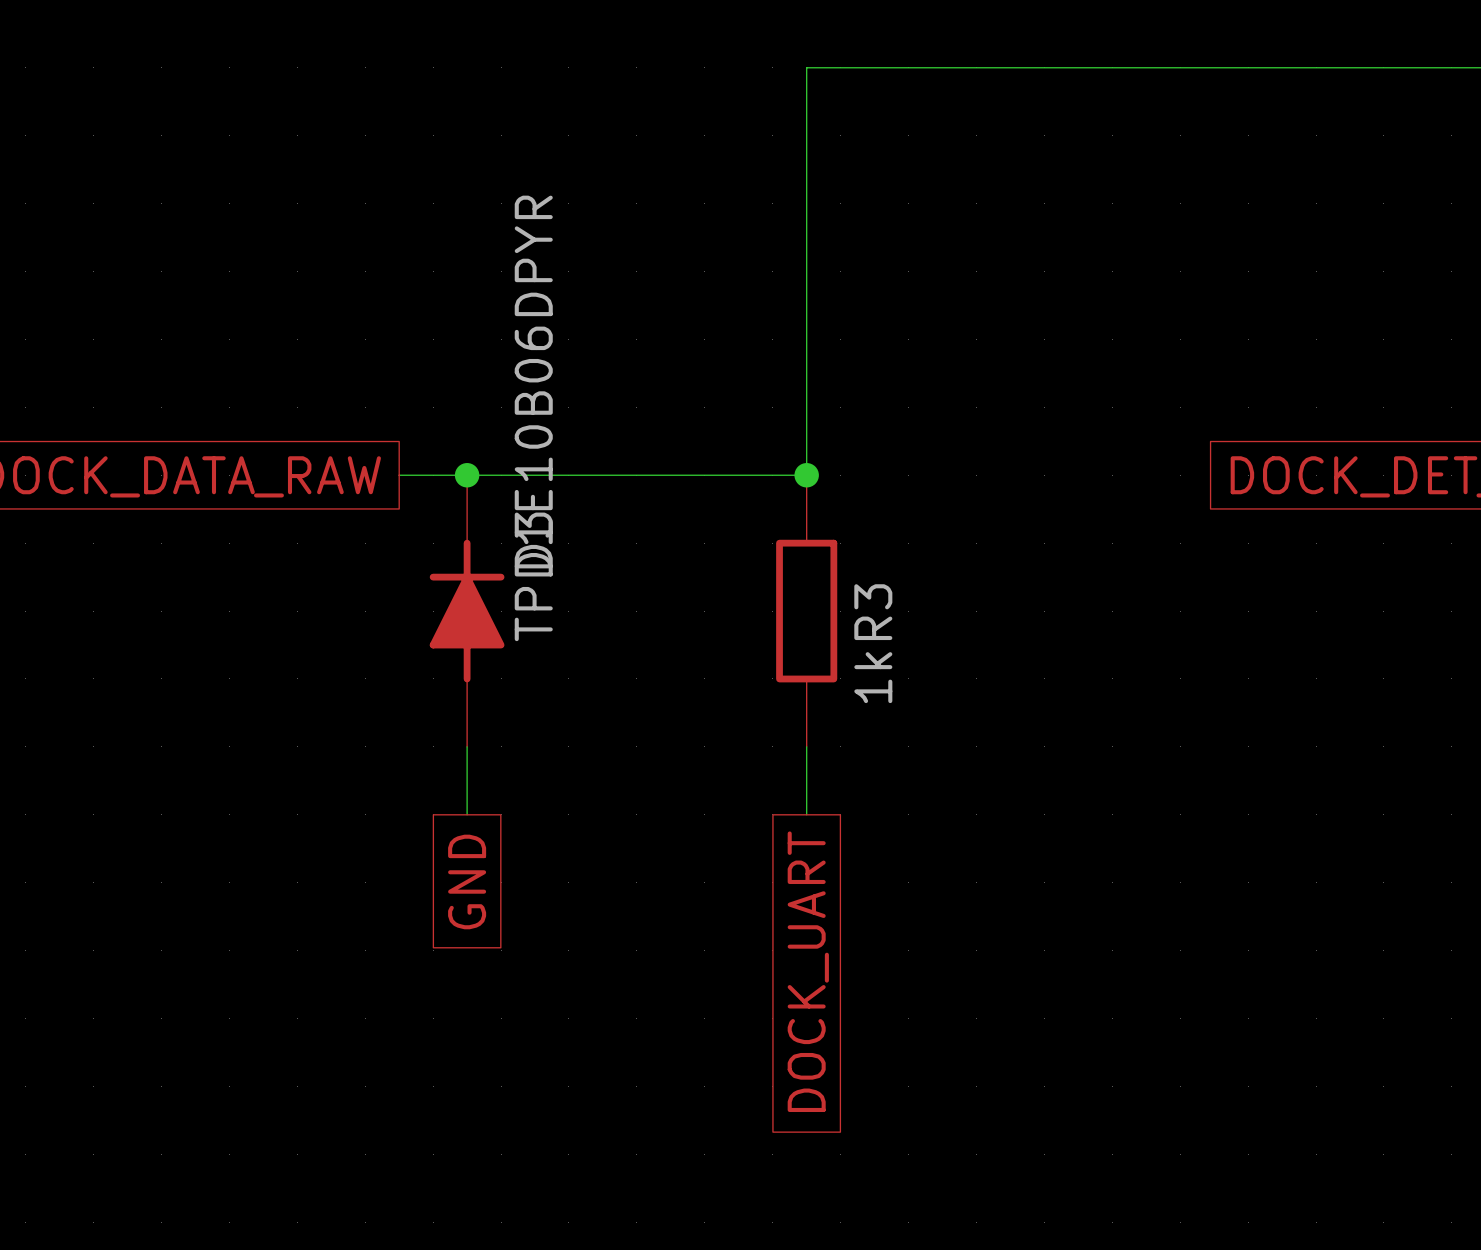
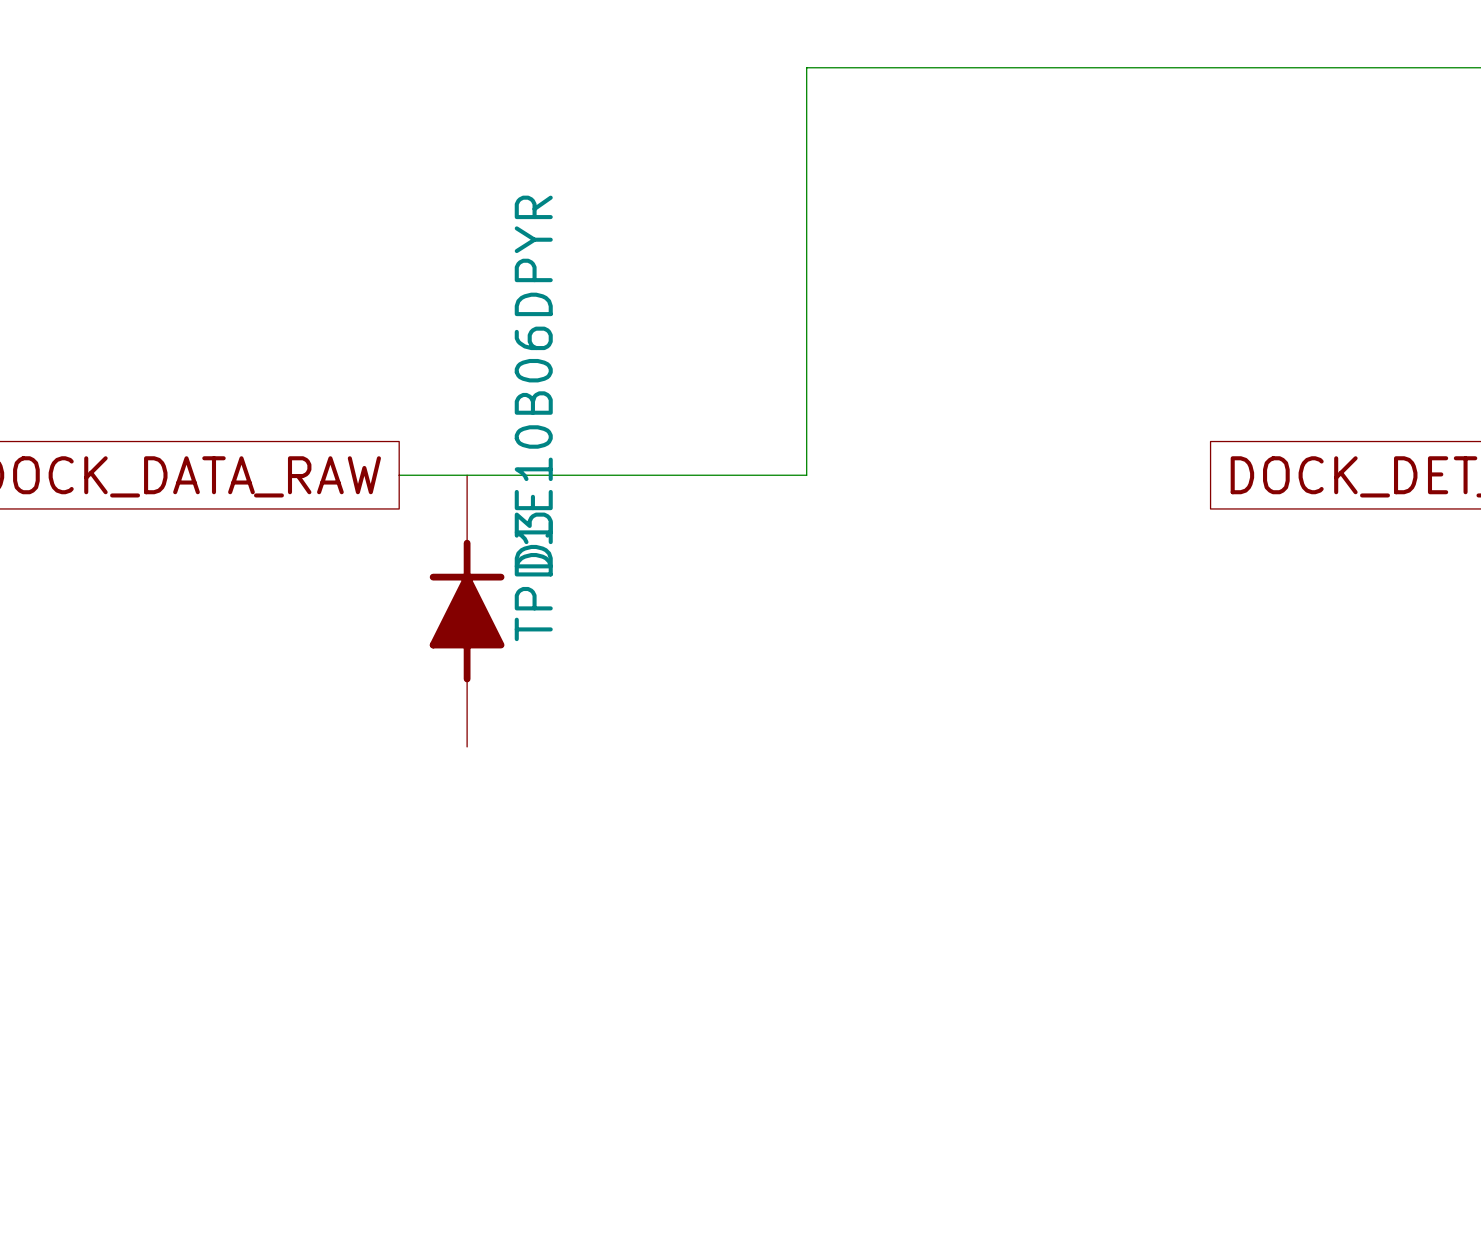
junction: (467, 475) -> none
junction: (806, 475) -> none
R3: 1k (806, 611) -> none
wire: (467, 746) (467, 814) -> none
wire: (806, 746) (806, 814) -> none
global label: GND (467, 881) -> none
global label: DOCK_UART (808, 971) -> none

